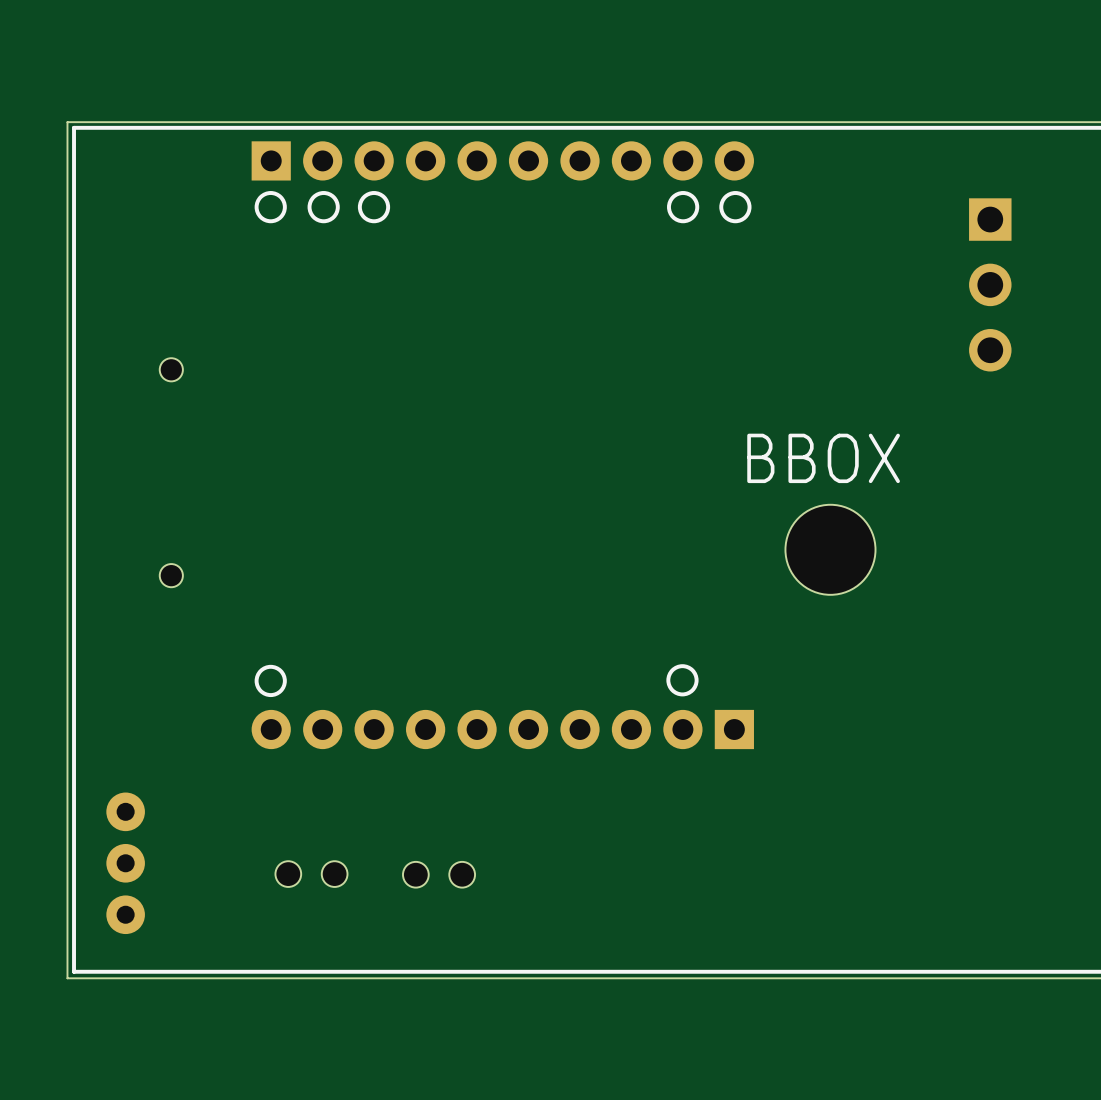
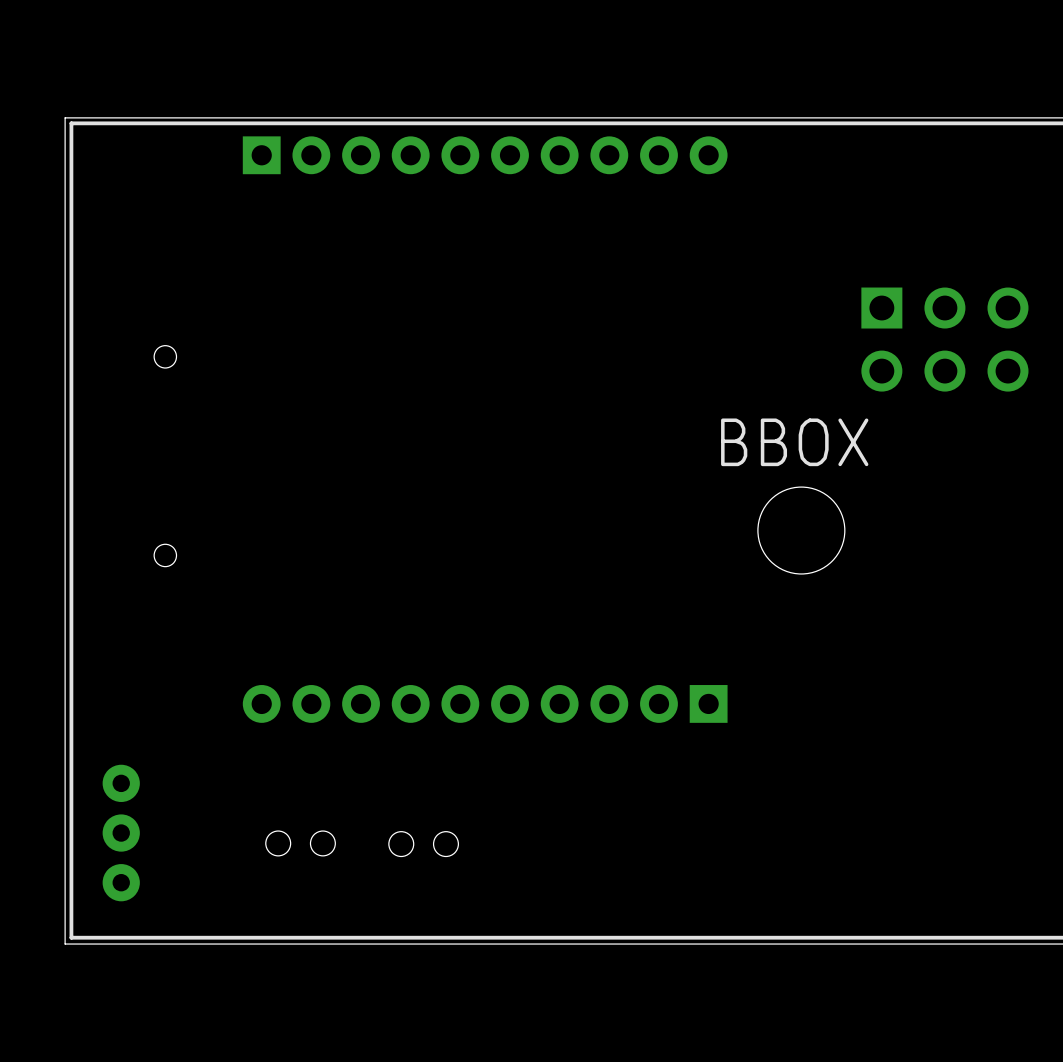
drawing: [254, 191, 391, 224] -> none
drawing: [667, 191, 752, 224] -> none
part: (990, 284) -> none
part: none -> (944, 339)
drawing: [254, 664, 287, 698] -> none
drawing: [666, 664, 699, 697] -> none

